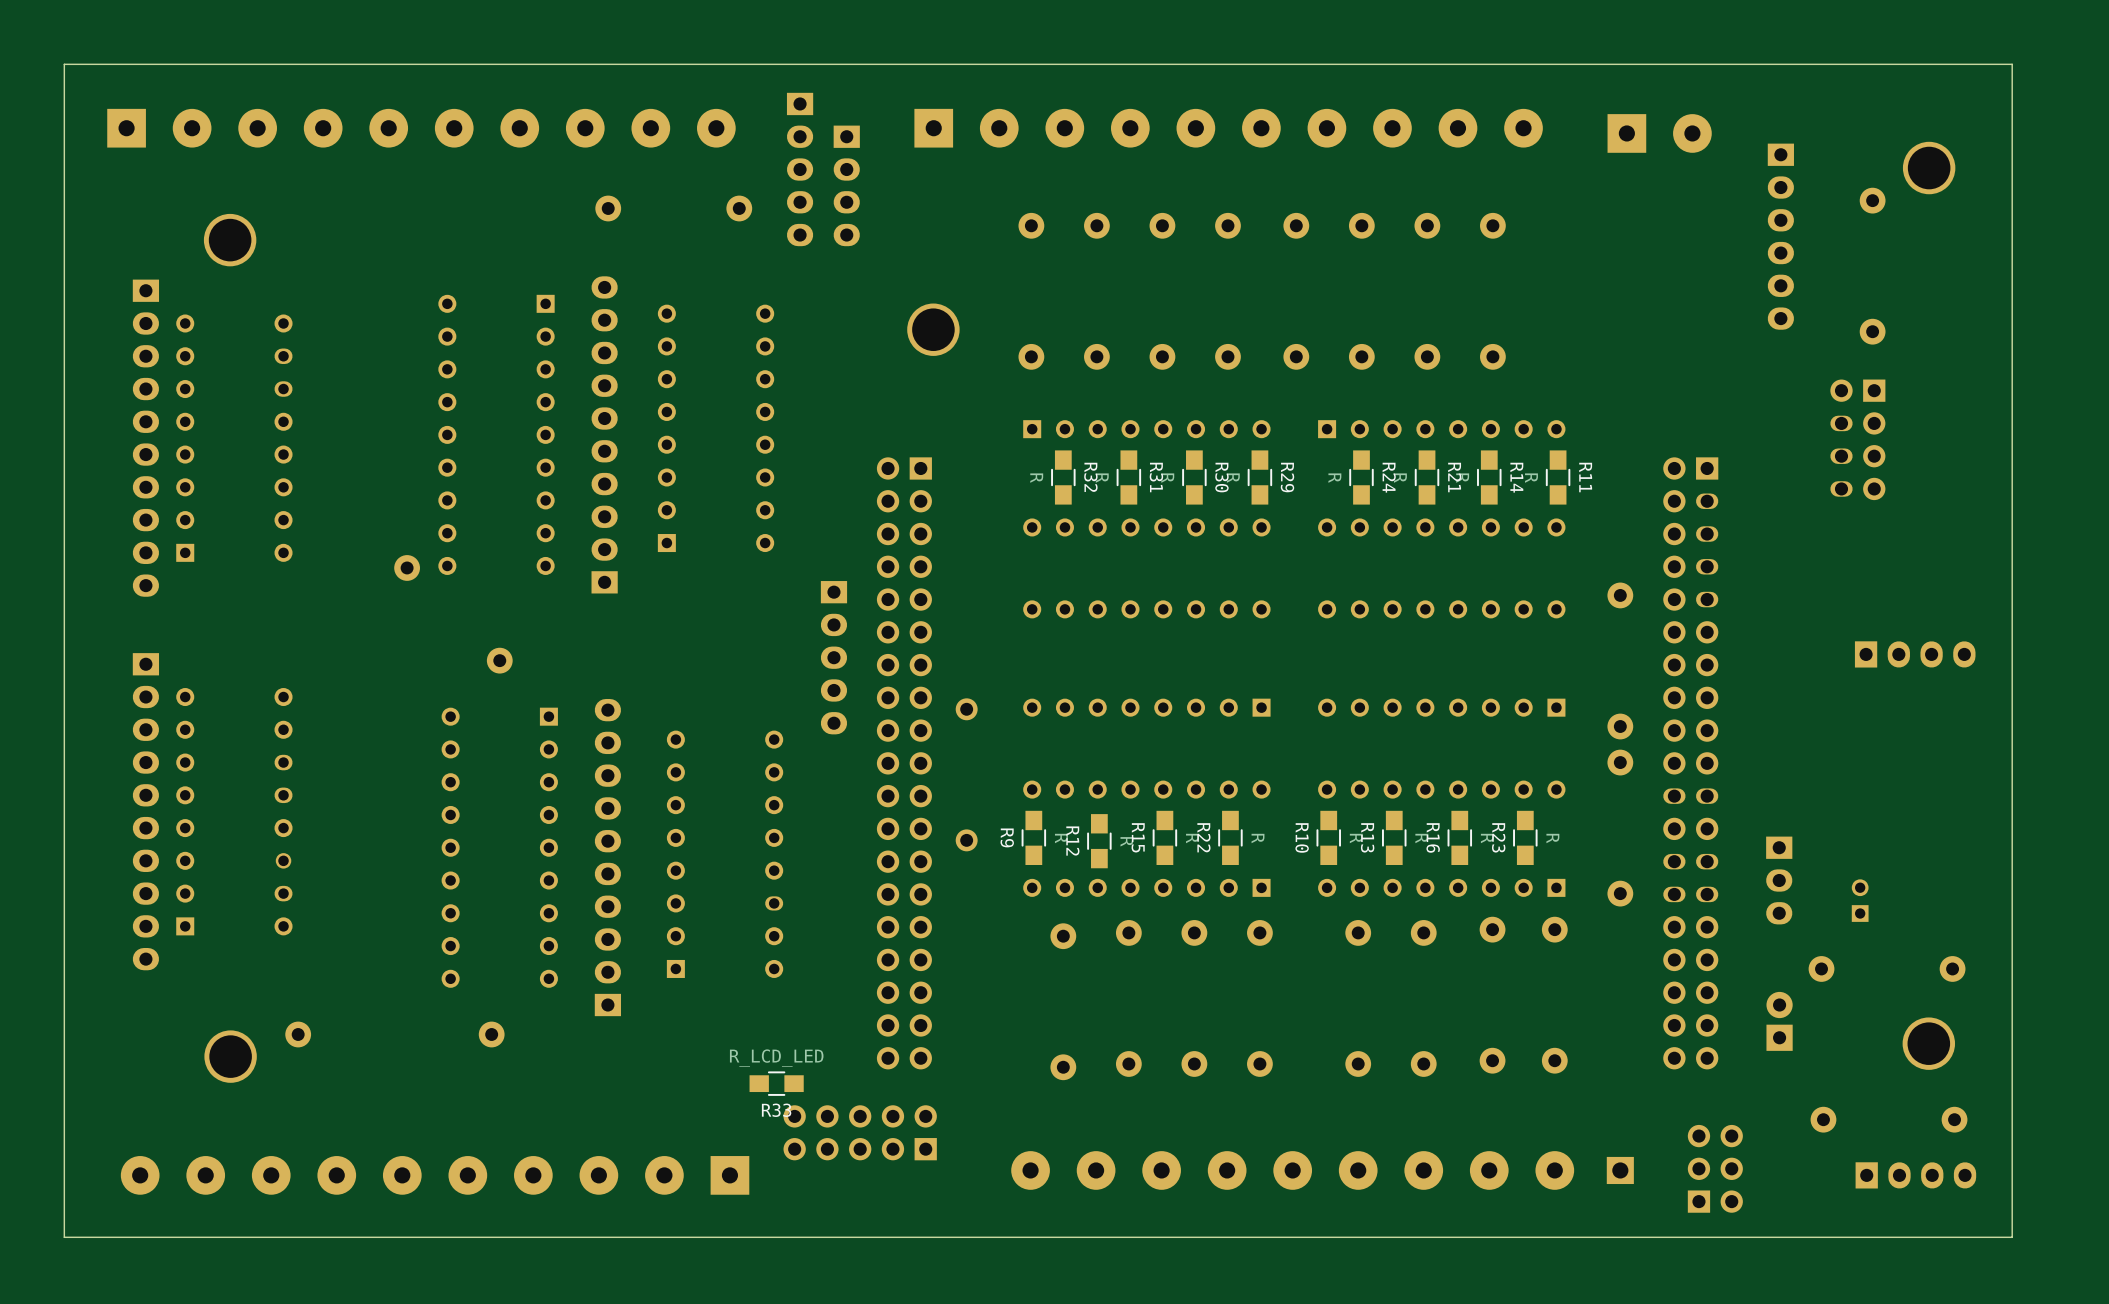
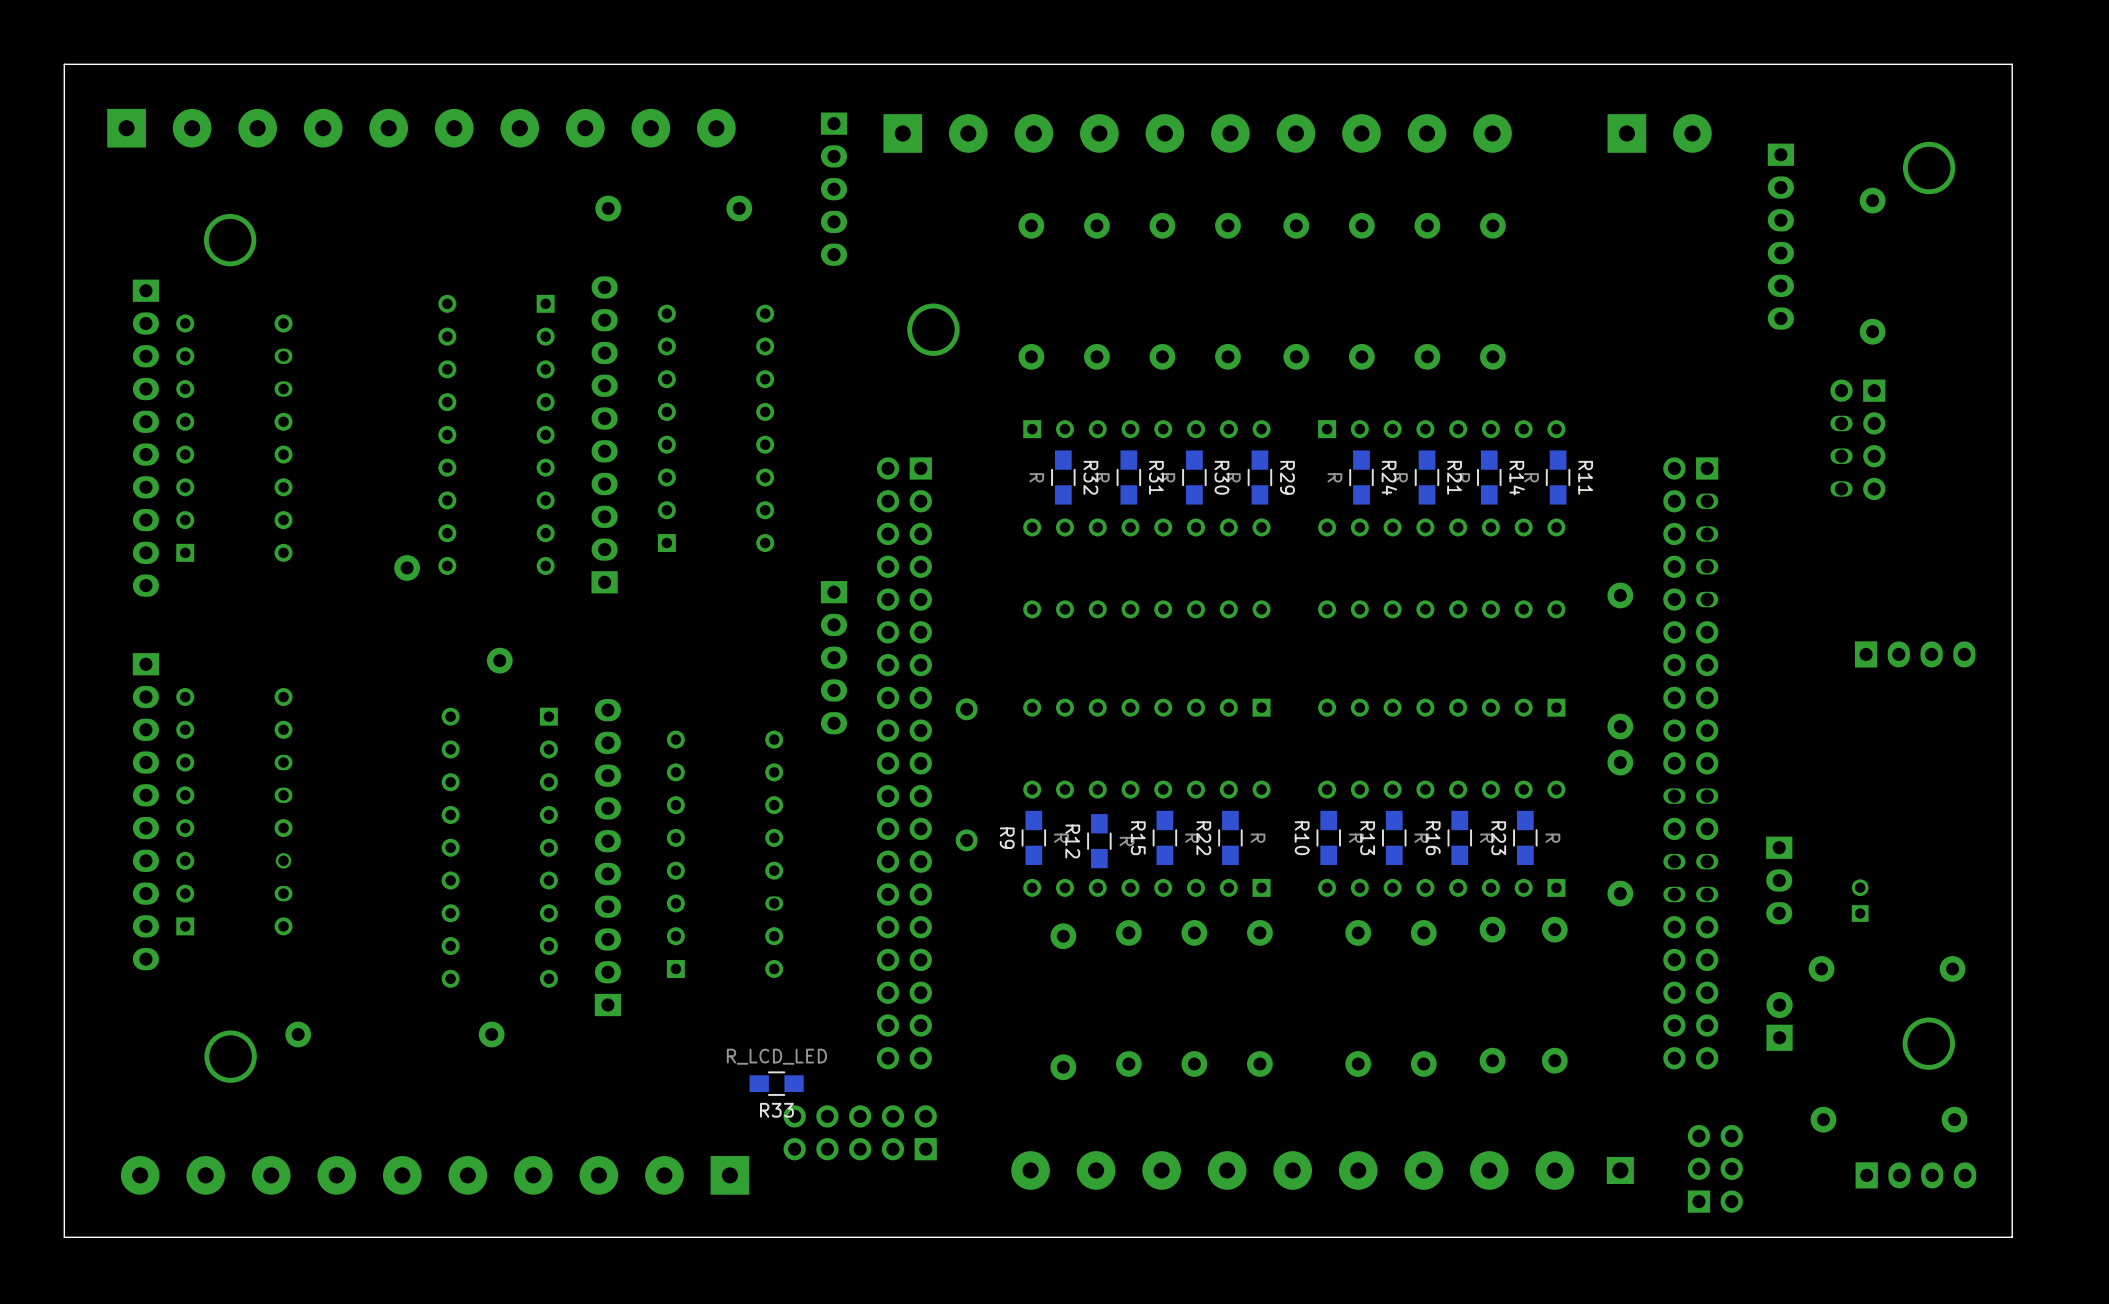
part position: (1228, 128) -> (1197, 133)
part position: (800, 169) -> (833, 189)
part: (846, 185) -> none

